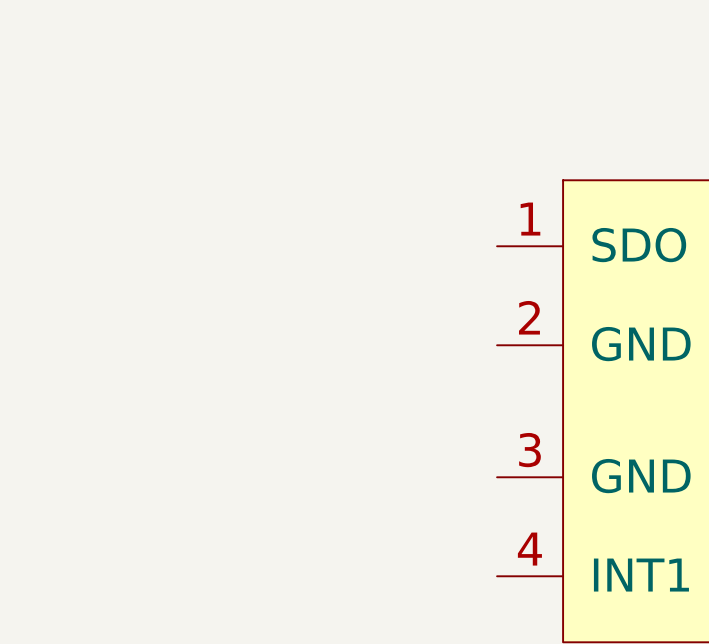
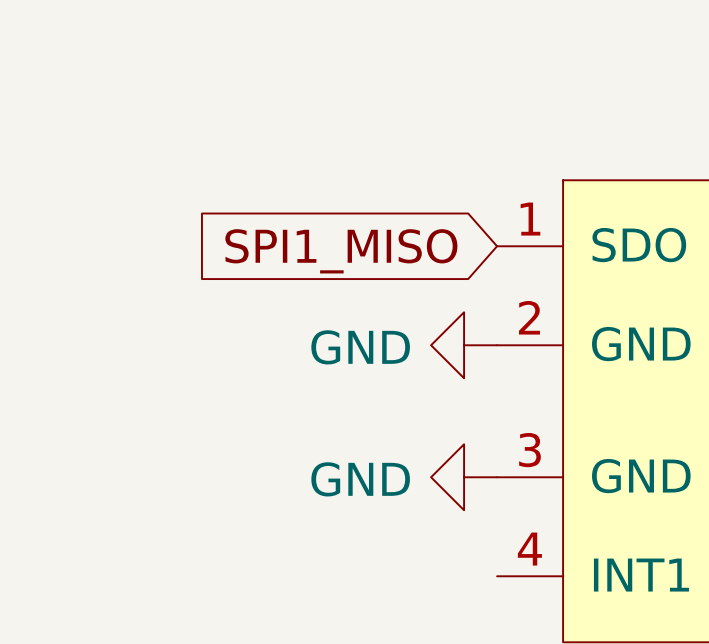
global label: none -> SPI1_MISO (341, 251)
power symbol: none -> GND (464, 345)
power symbol: none -> GND (464, 477)

